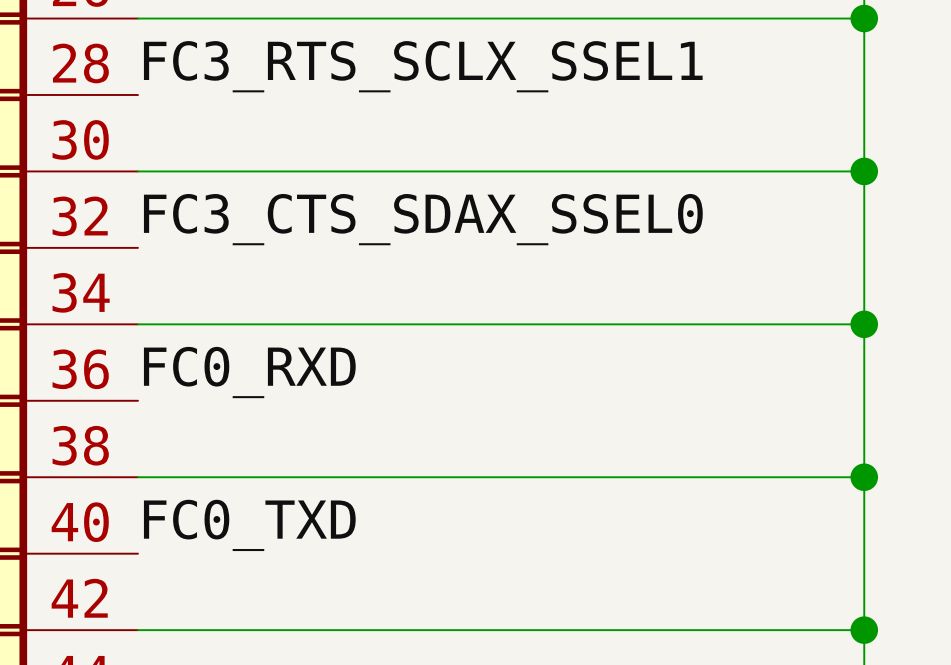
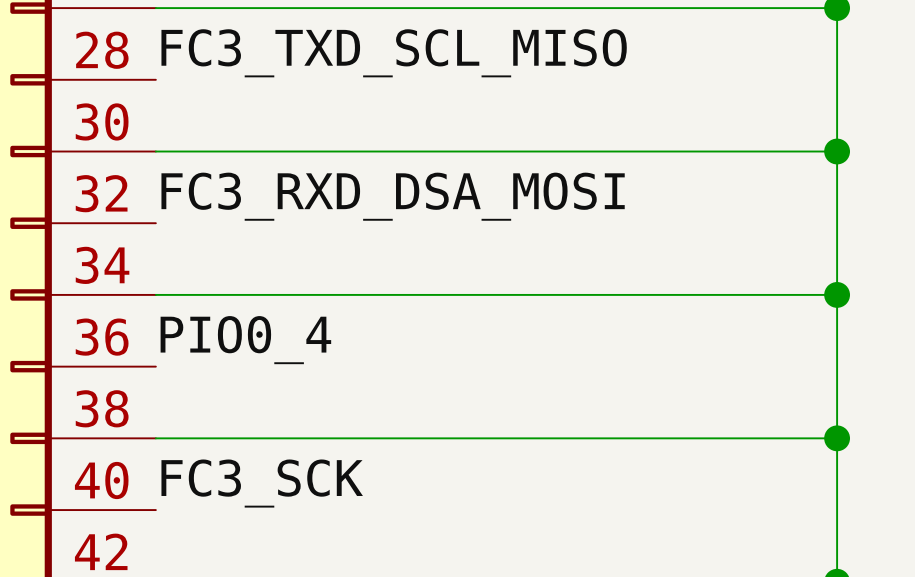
label: FC3_RTS_SCLX_SSEL1 (423, 66) -> FC3_TXD_SCL_MISO (394, 53)
label: FC3_CTS_SDAX_SSEL0 (423, 219) -> FC3_RXD_DSA_MOSI (393, 196)
label: FC0_RXD (249, 372) -> PIO0_4 (245, 340)
label: FC0_TXD (249, 525) -> FC3_SCK (262, 483)

